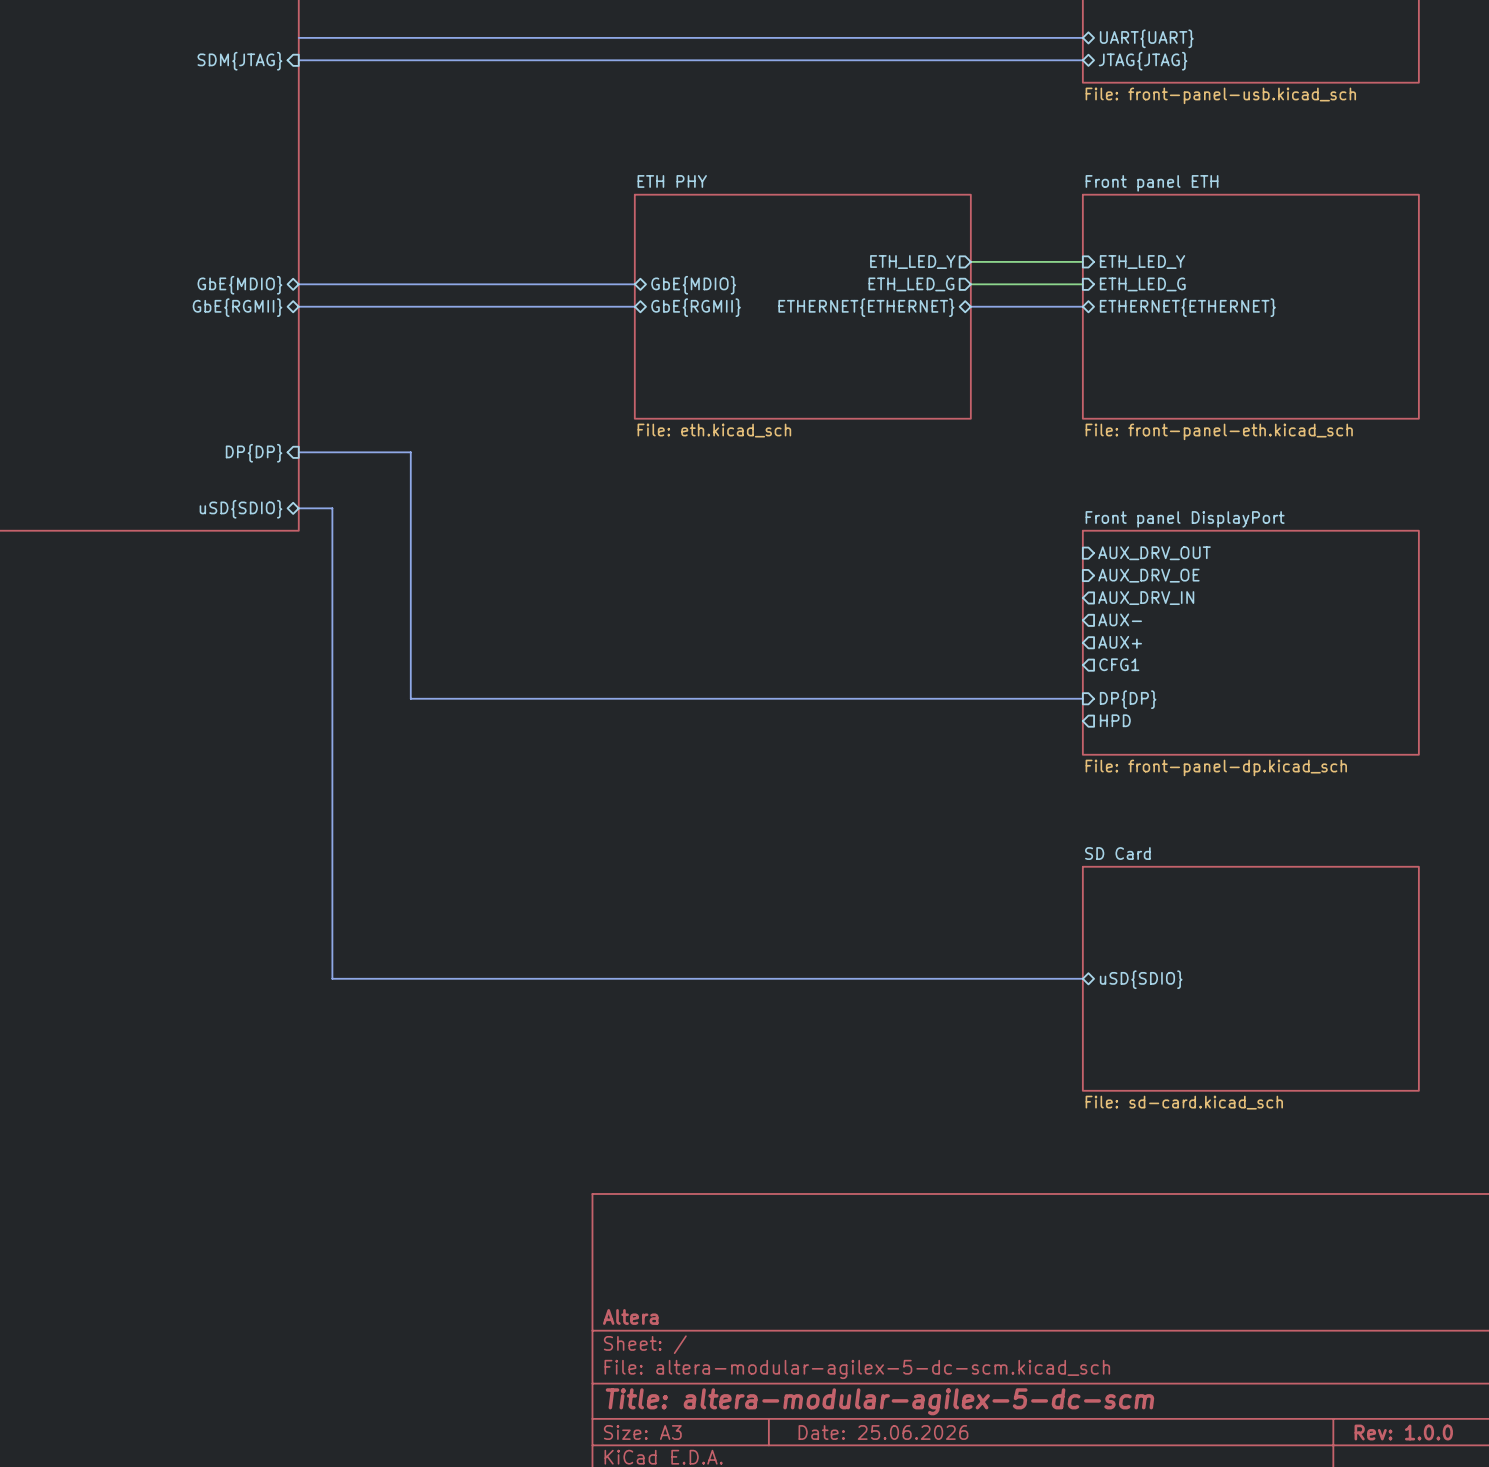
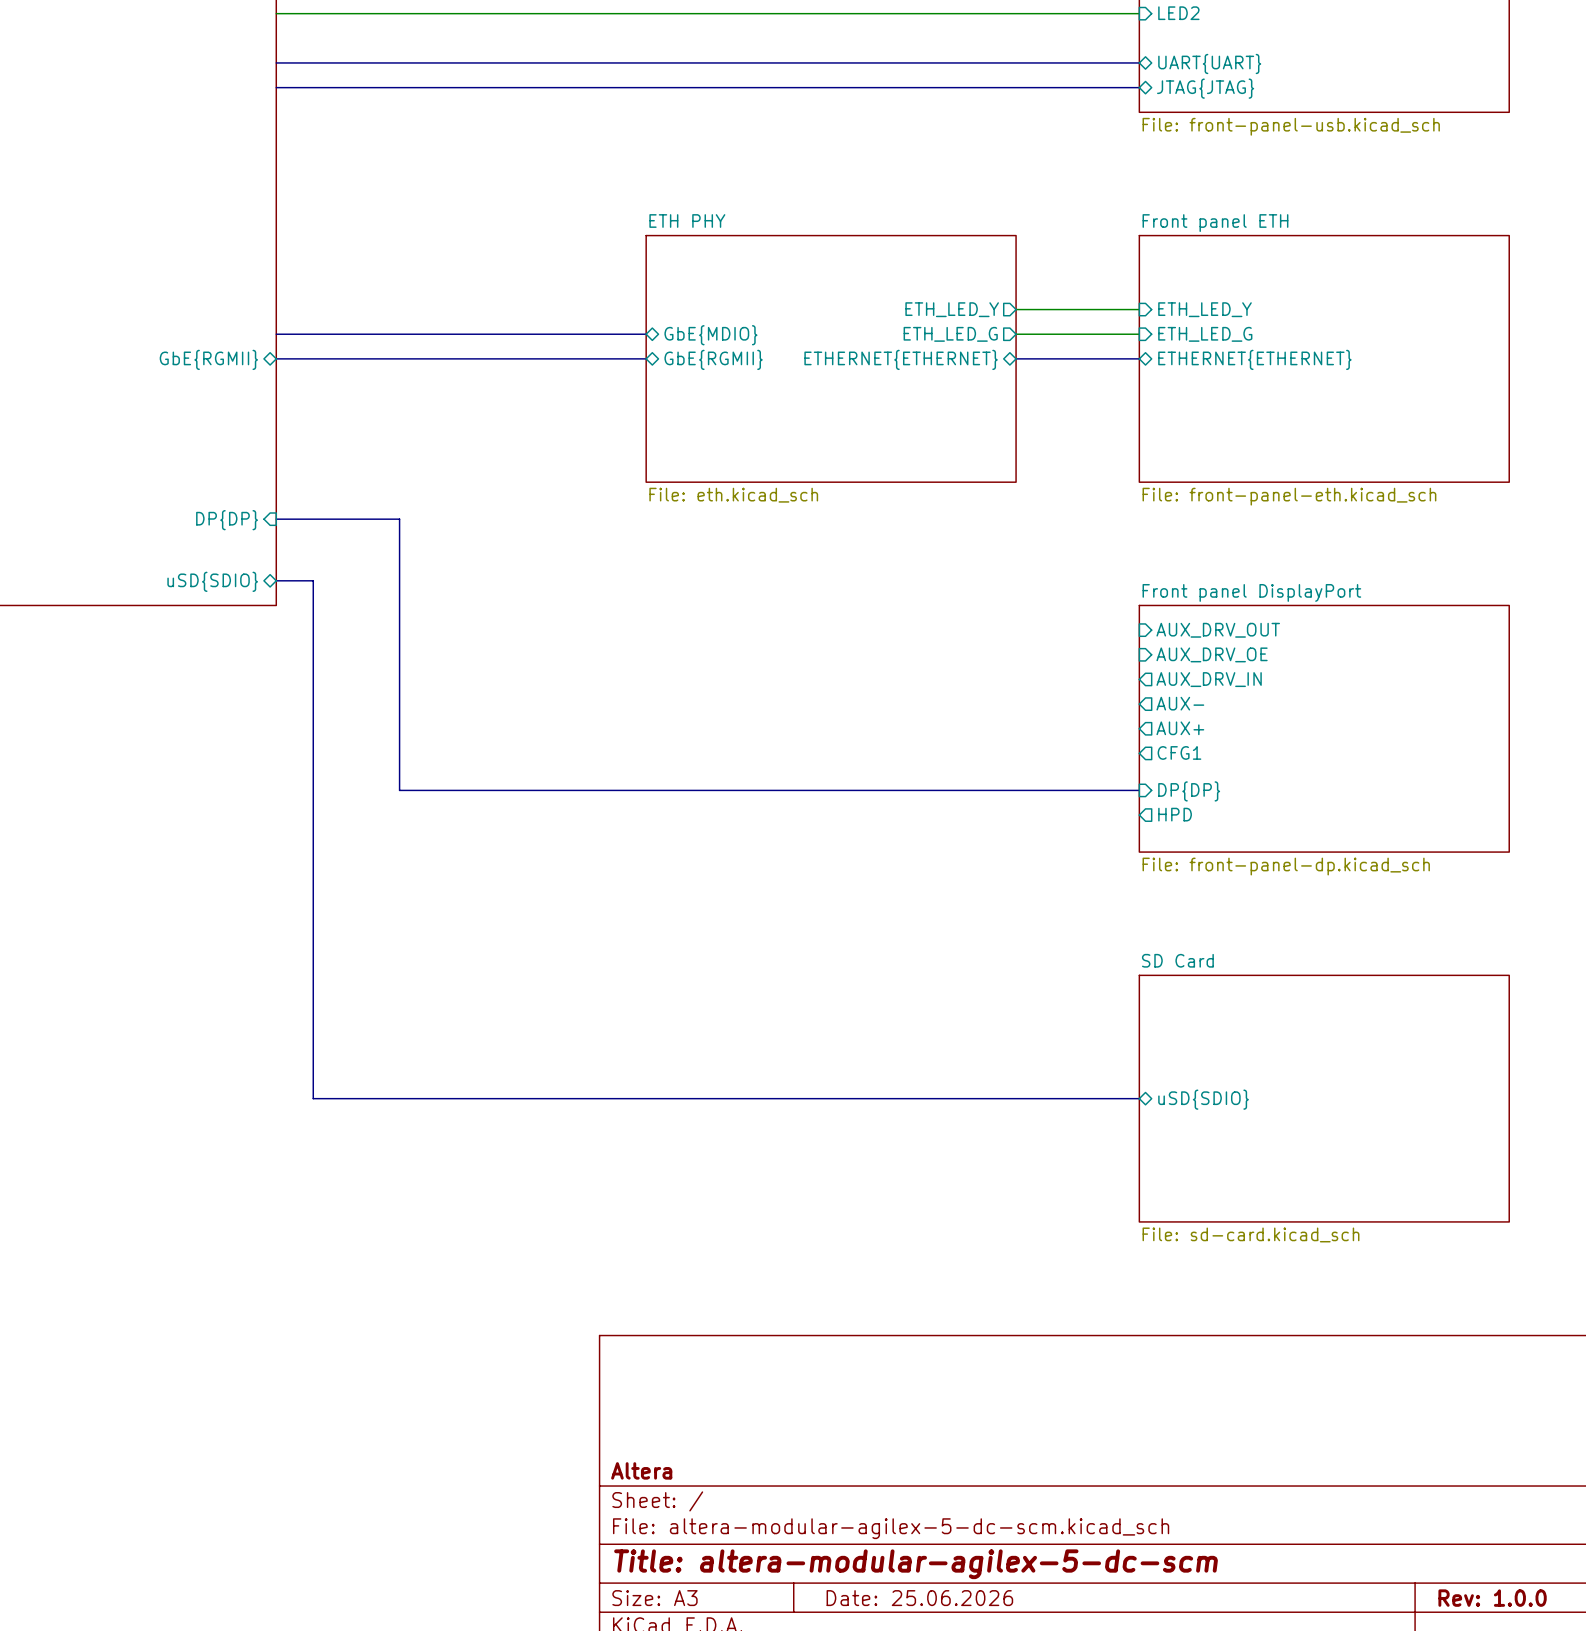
sheet pin: SDM{JTAG} (239, 61) -> none
sheet pin: GbE{MDIO} (239, 285) -> none

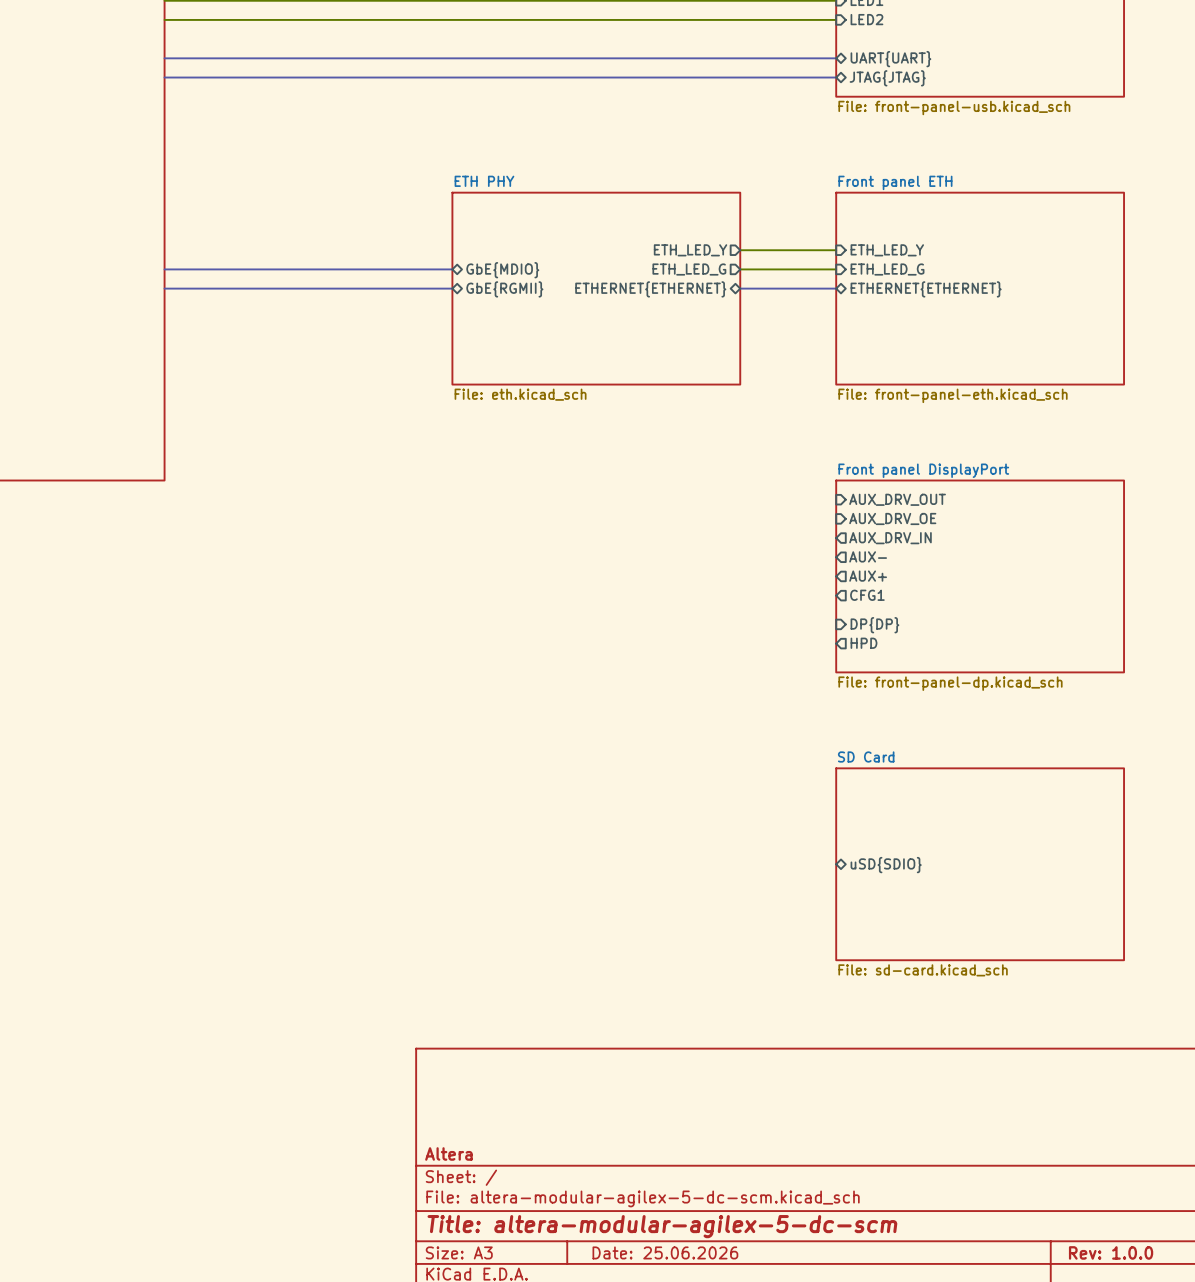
sheet pin: GbE{RGMII} (208, 359) -> none
bus: (276, 519) (399, 519) (399, 790) (1139, 790) -> none
sheet pin: DP{DP} (227, 520) -> none
bus: (276, 580) (313, 580) (313, 1098) (1139, 1098) -> none
sheet pin: uSD{SDIO} (212, 581) -> none

